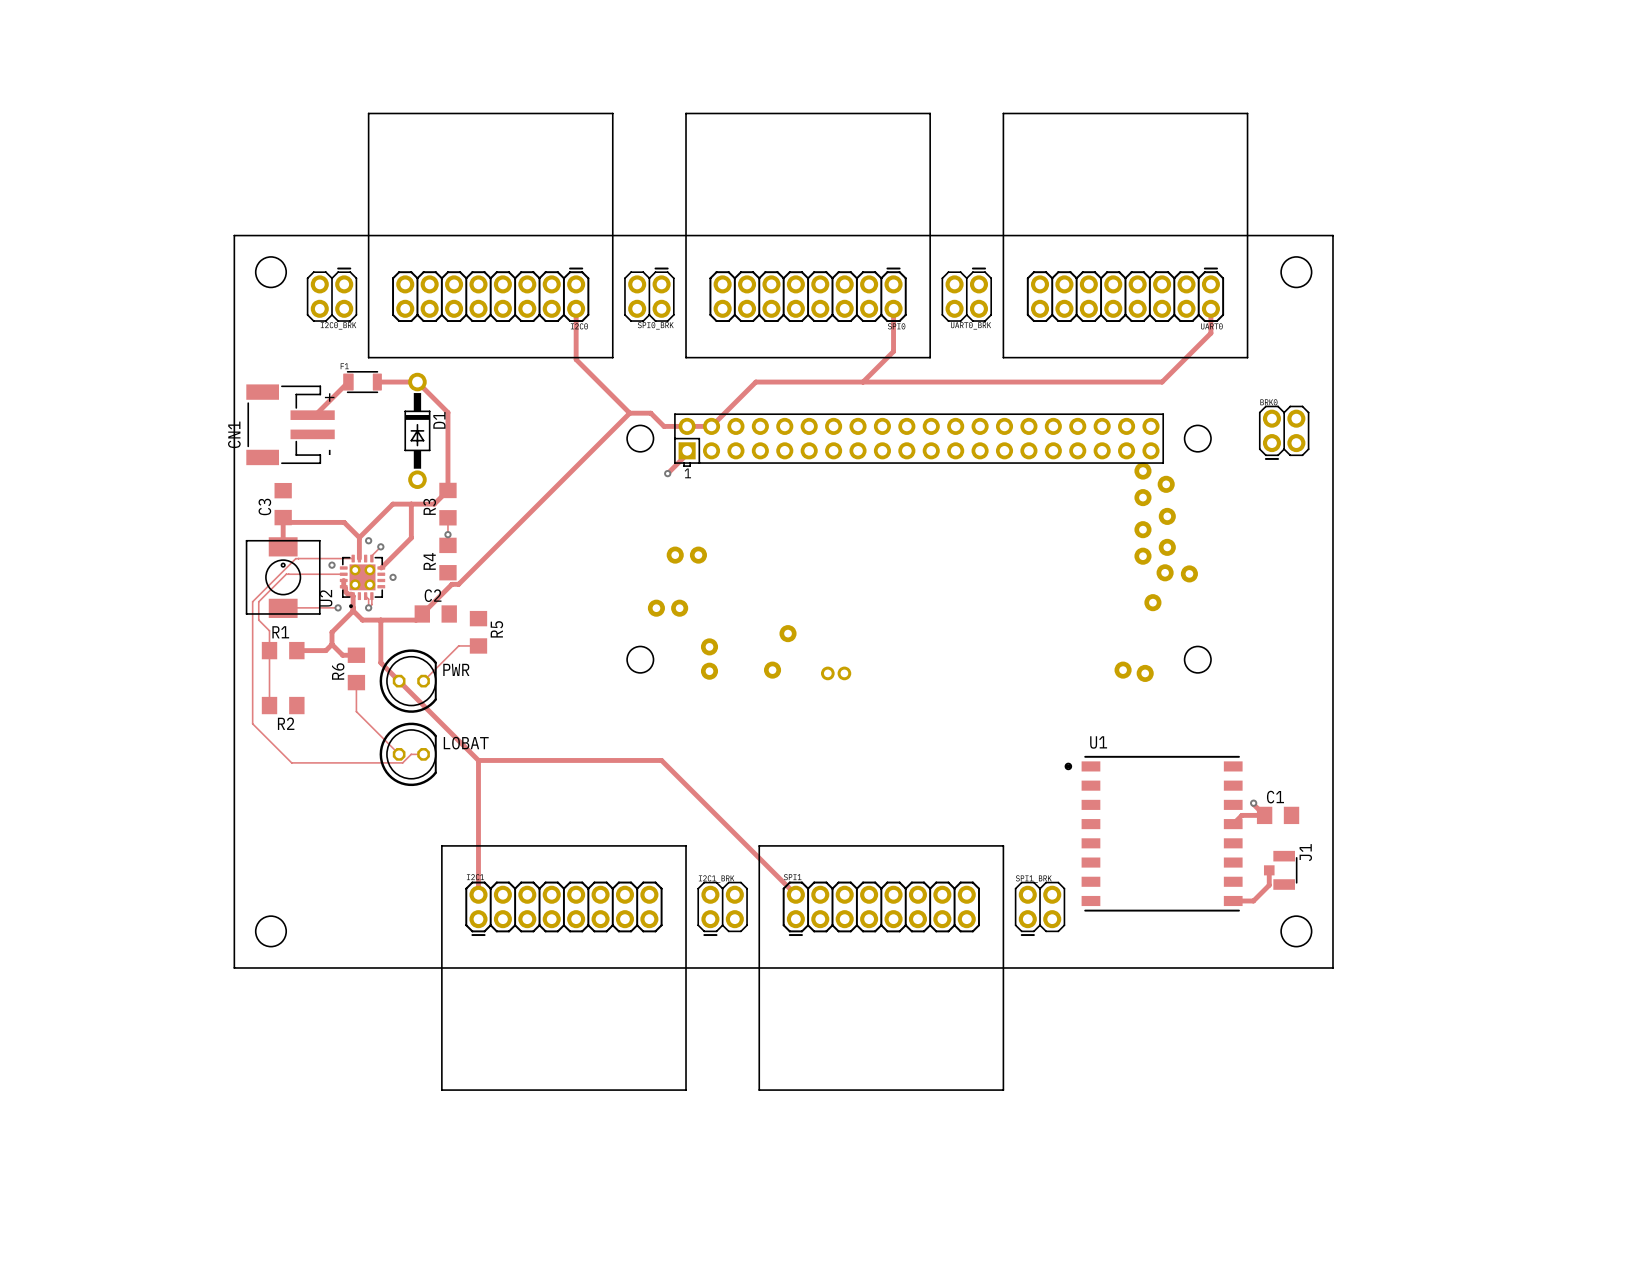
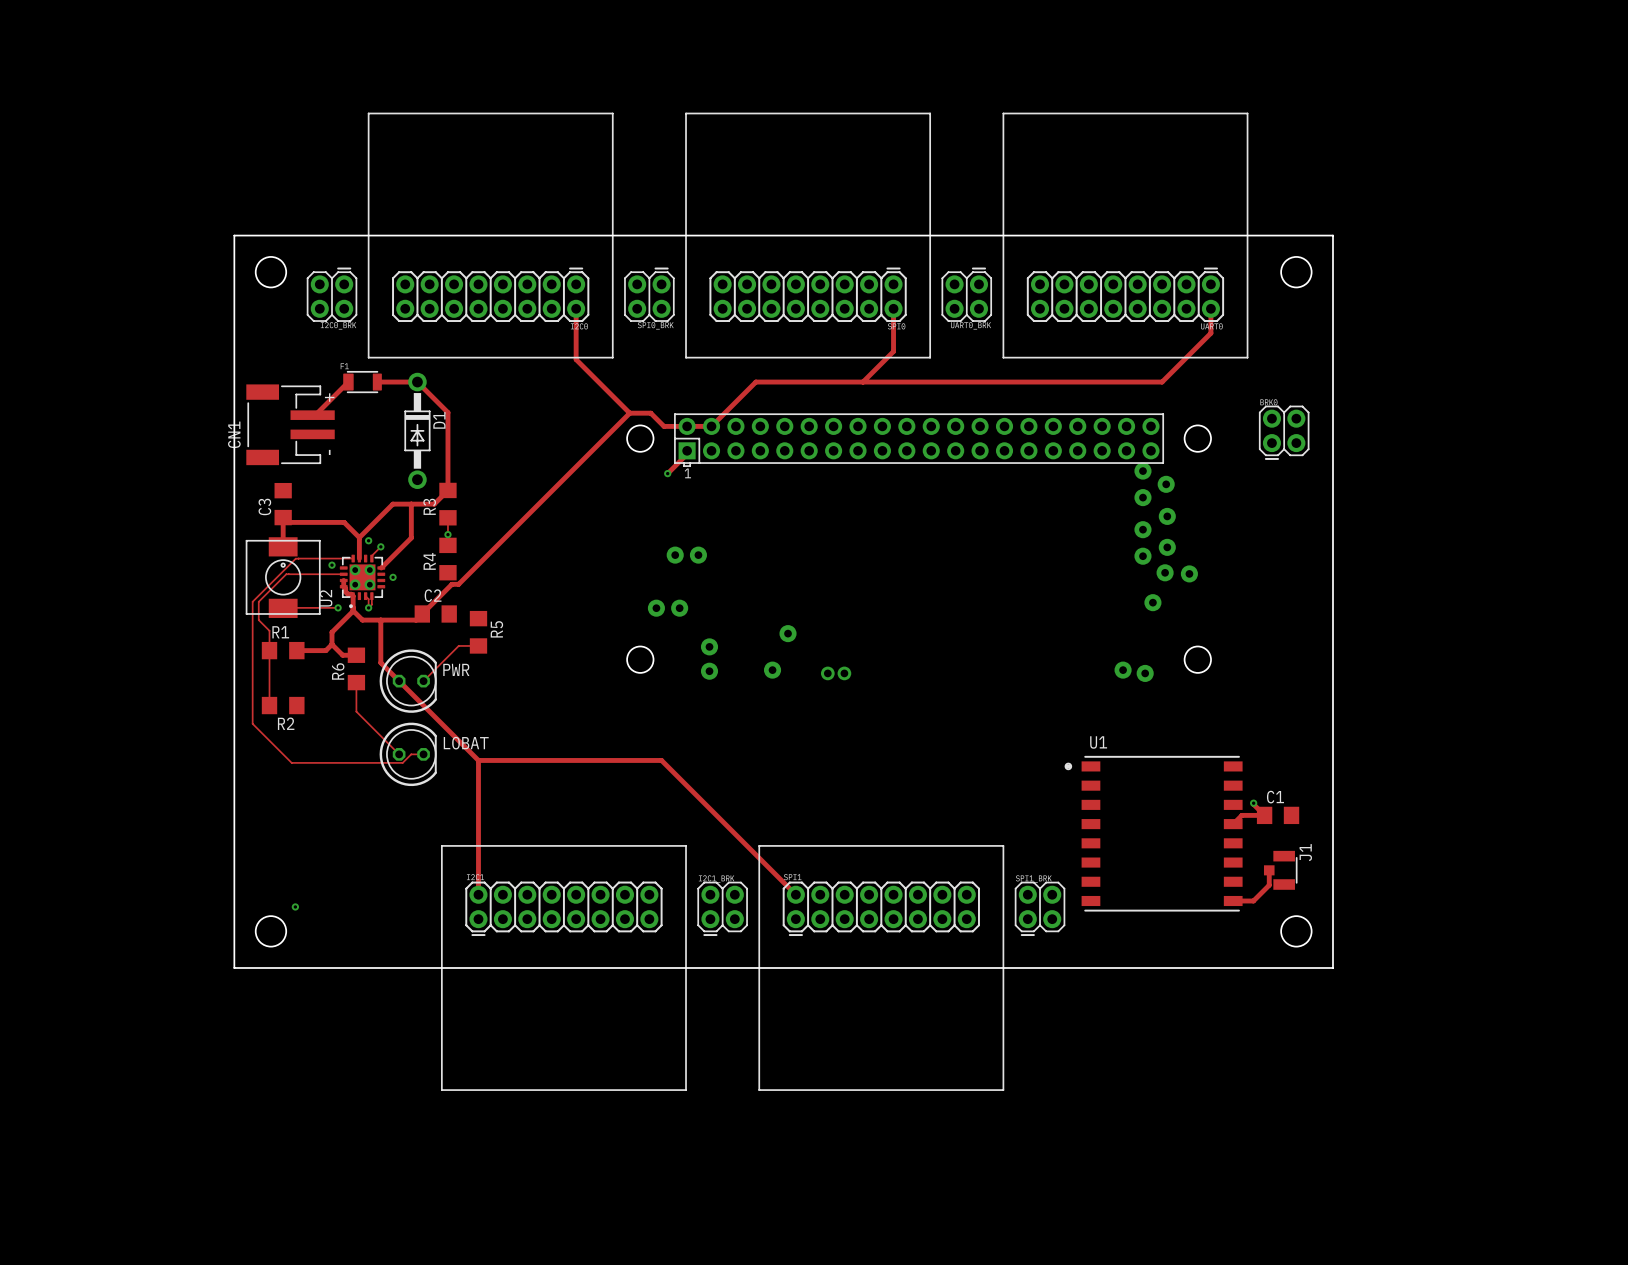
via: none -> (295, 906)

